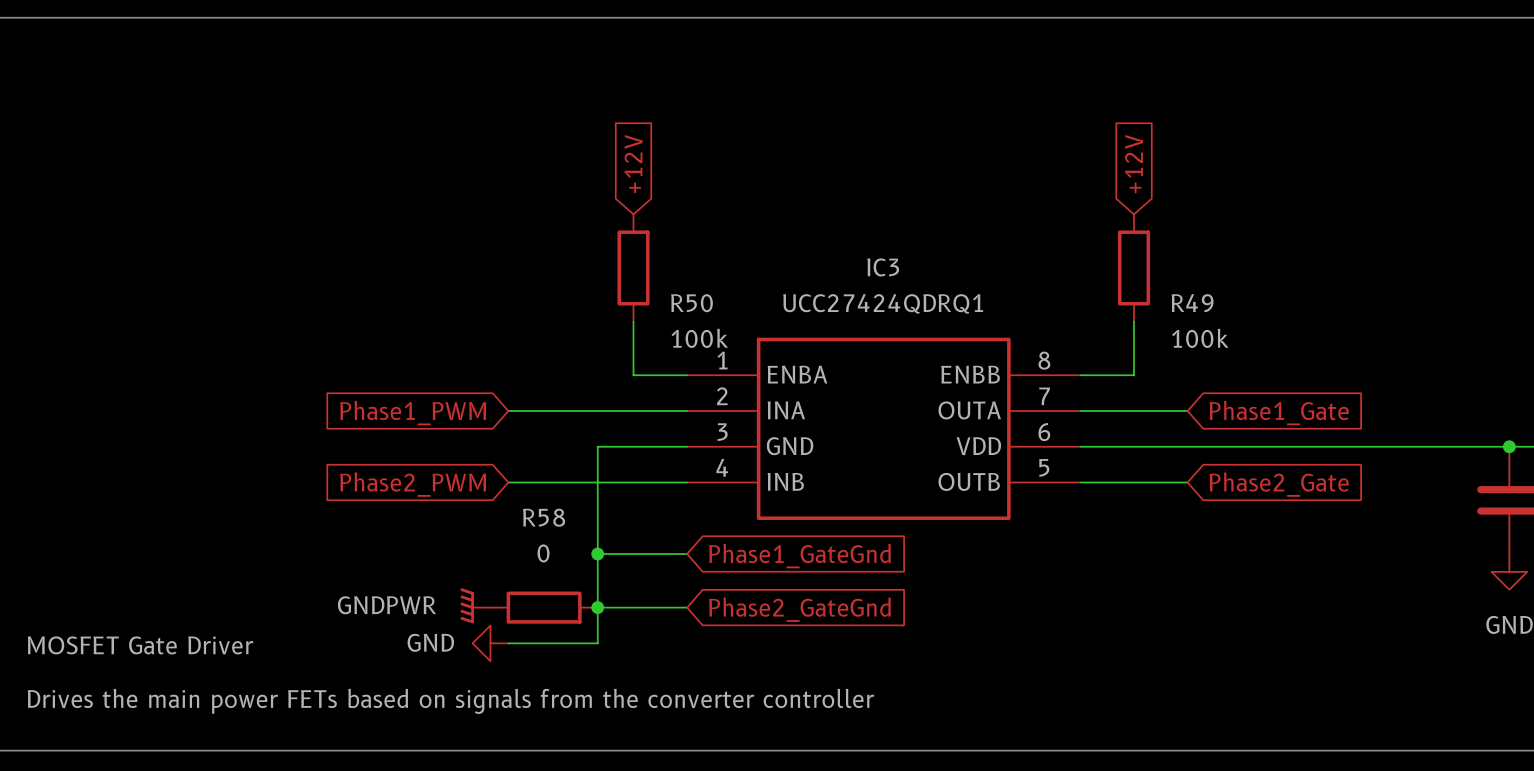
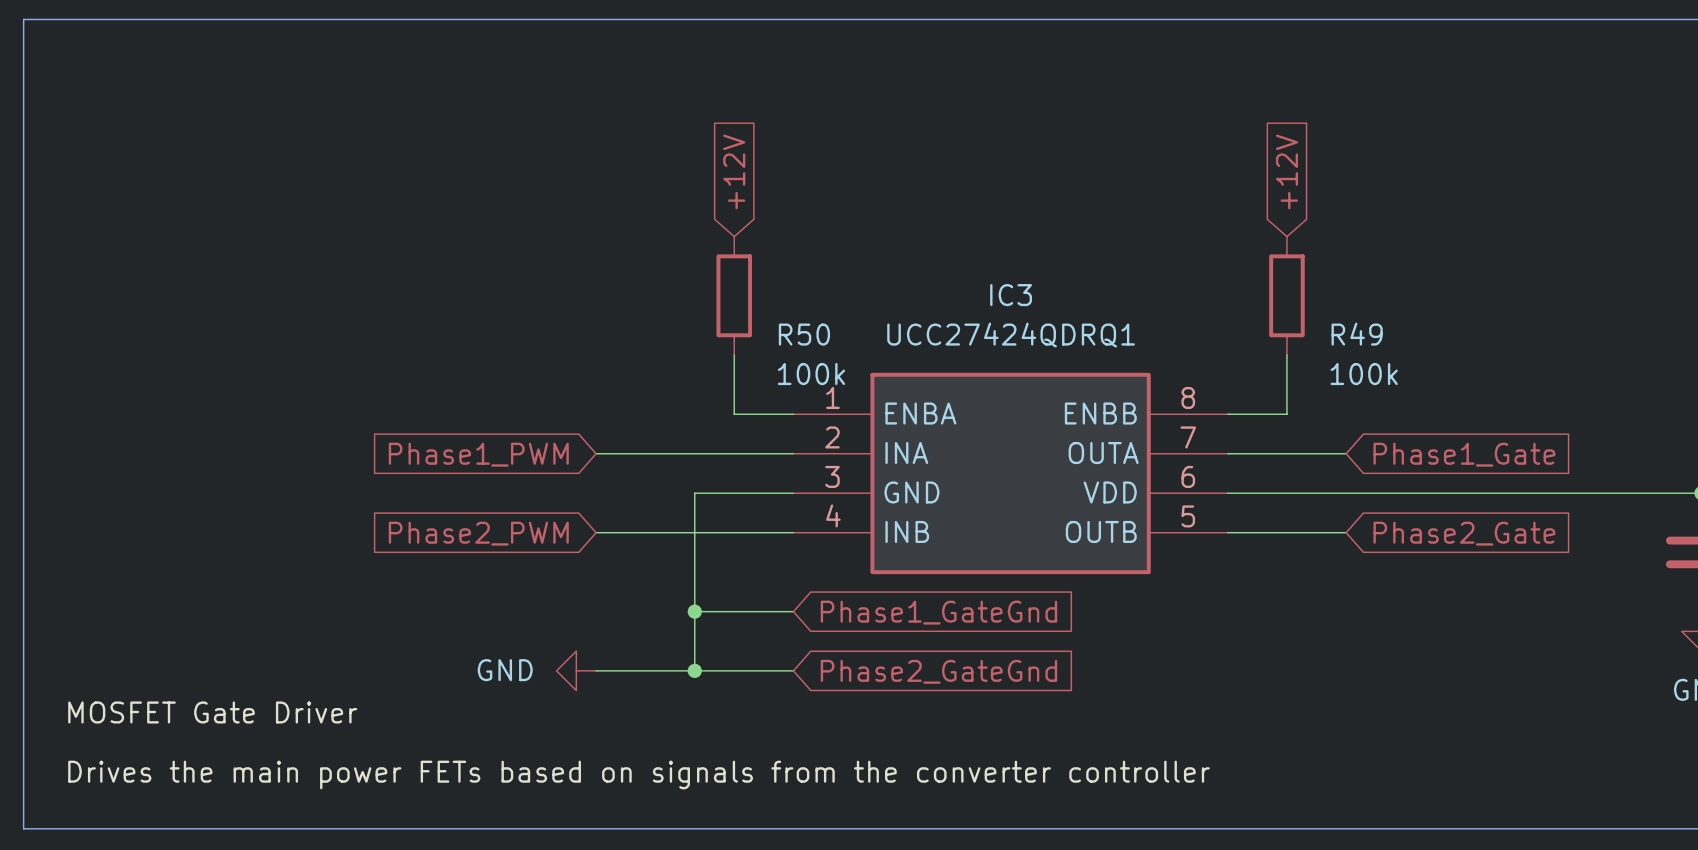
power symbol: GNDPWR (475, 605) -> none
R58: 0 (544, 607) -> none
wire: (597, 607) (597, 643) (508, 643) -> (694, 670) (596, 670)
power symbol position: GND (490, 643) -> GND (576, 670)

